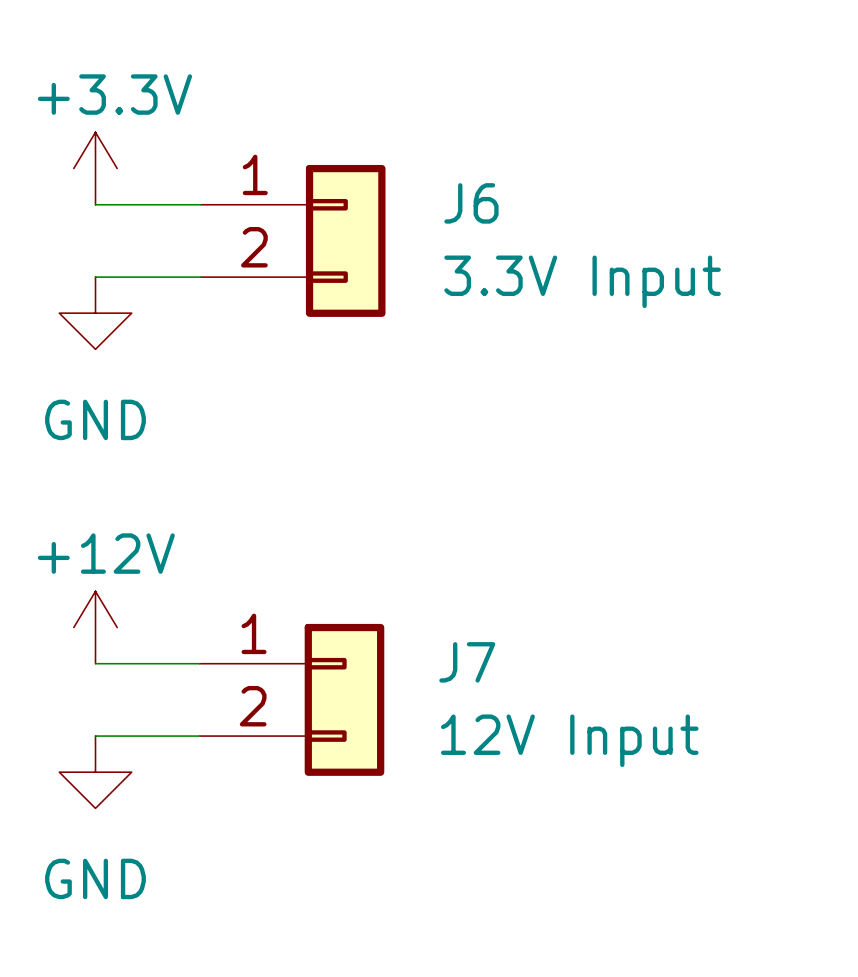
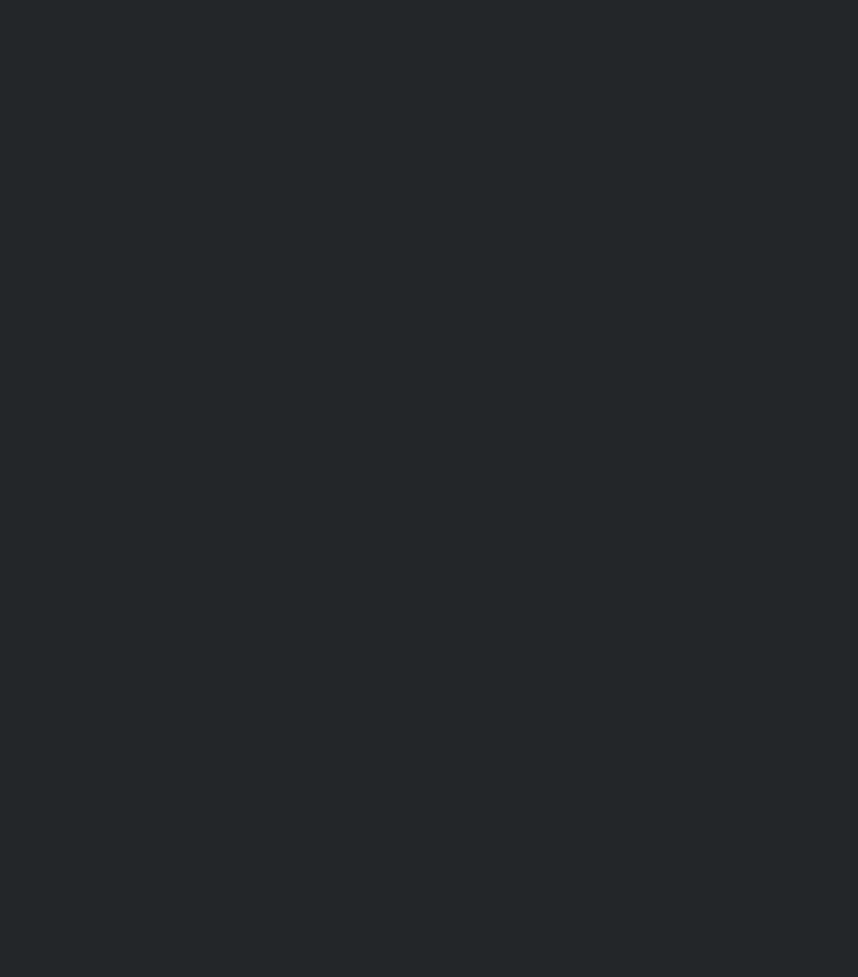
power symbol: +3.3V (95, 168) -> none
wire: (95, 204) (201, 204) -> none
J6: 3.3V Input (293, 240) -> none
wire: (95, 277) (201, 277) -> none
power symbol: GND (95, 313) -> none
power symbol: +12V (95, 627) -> none
wire: (95, 663) (199, 663) -> none
J7: 12V Input (292, 699) -> none
wire: (95, 736) (199, 736) -> none
power symbol: GND (95, 772) -> none

